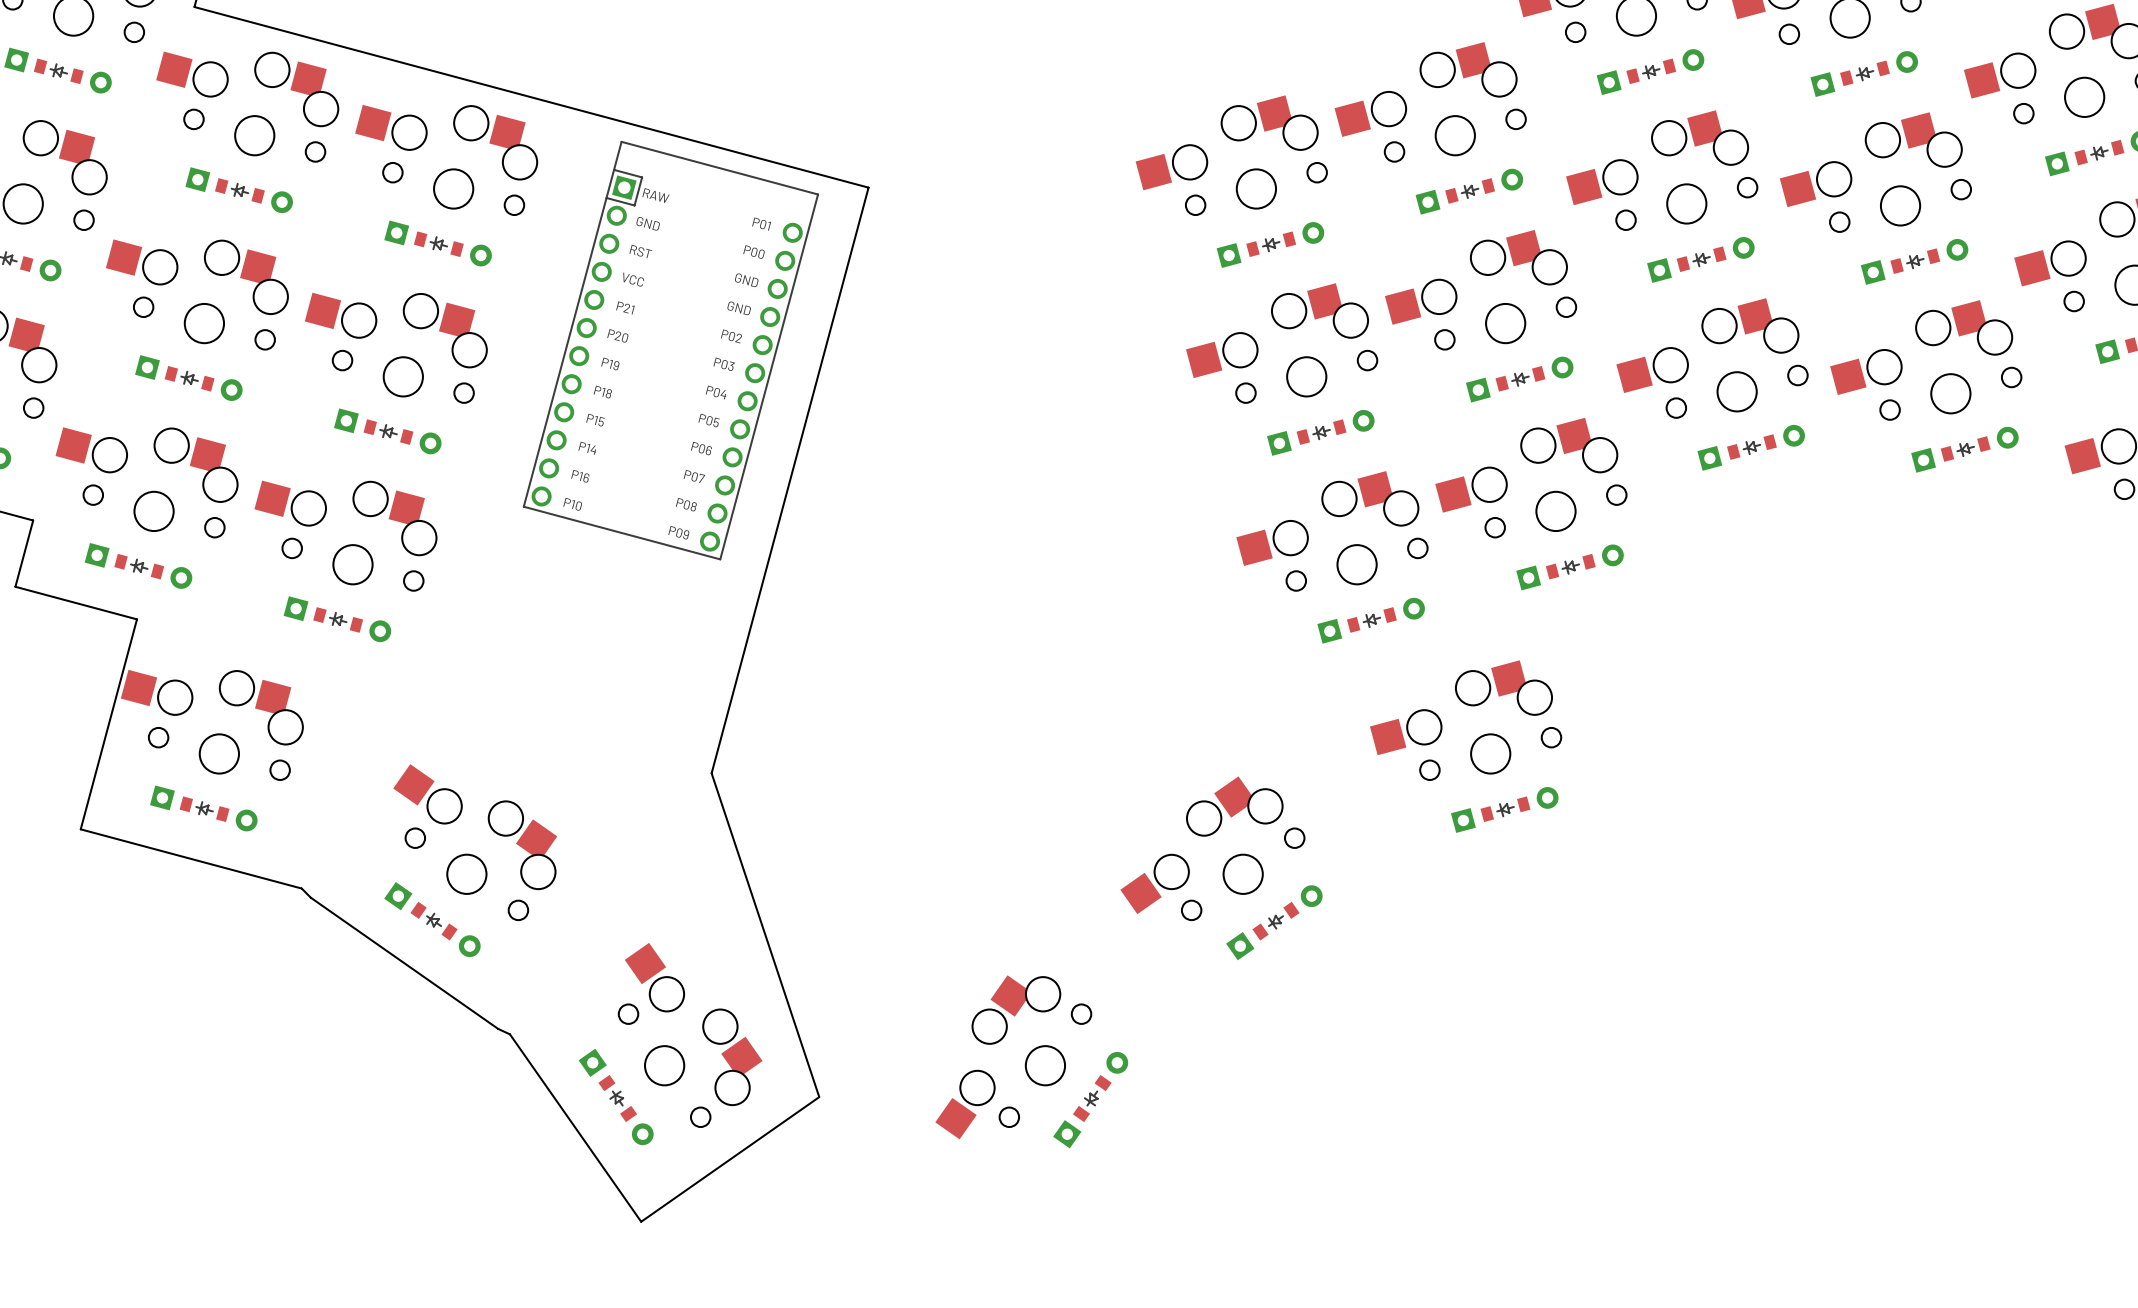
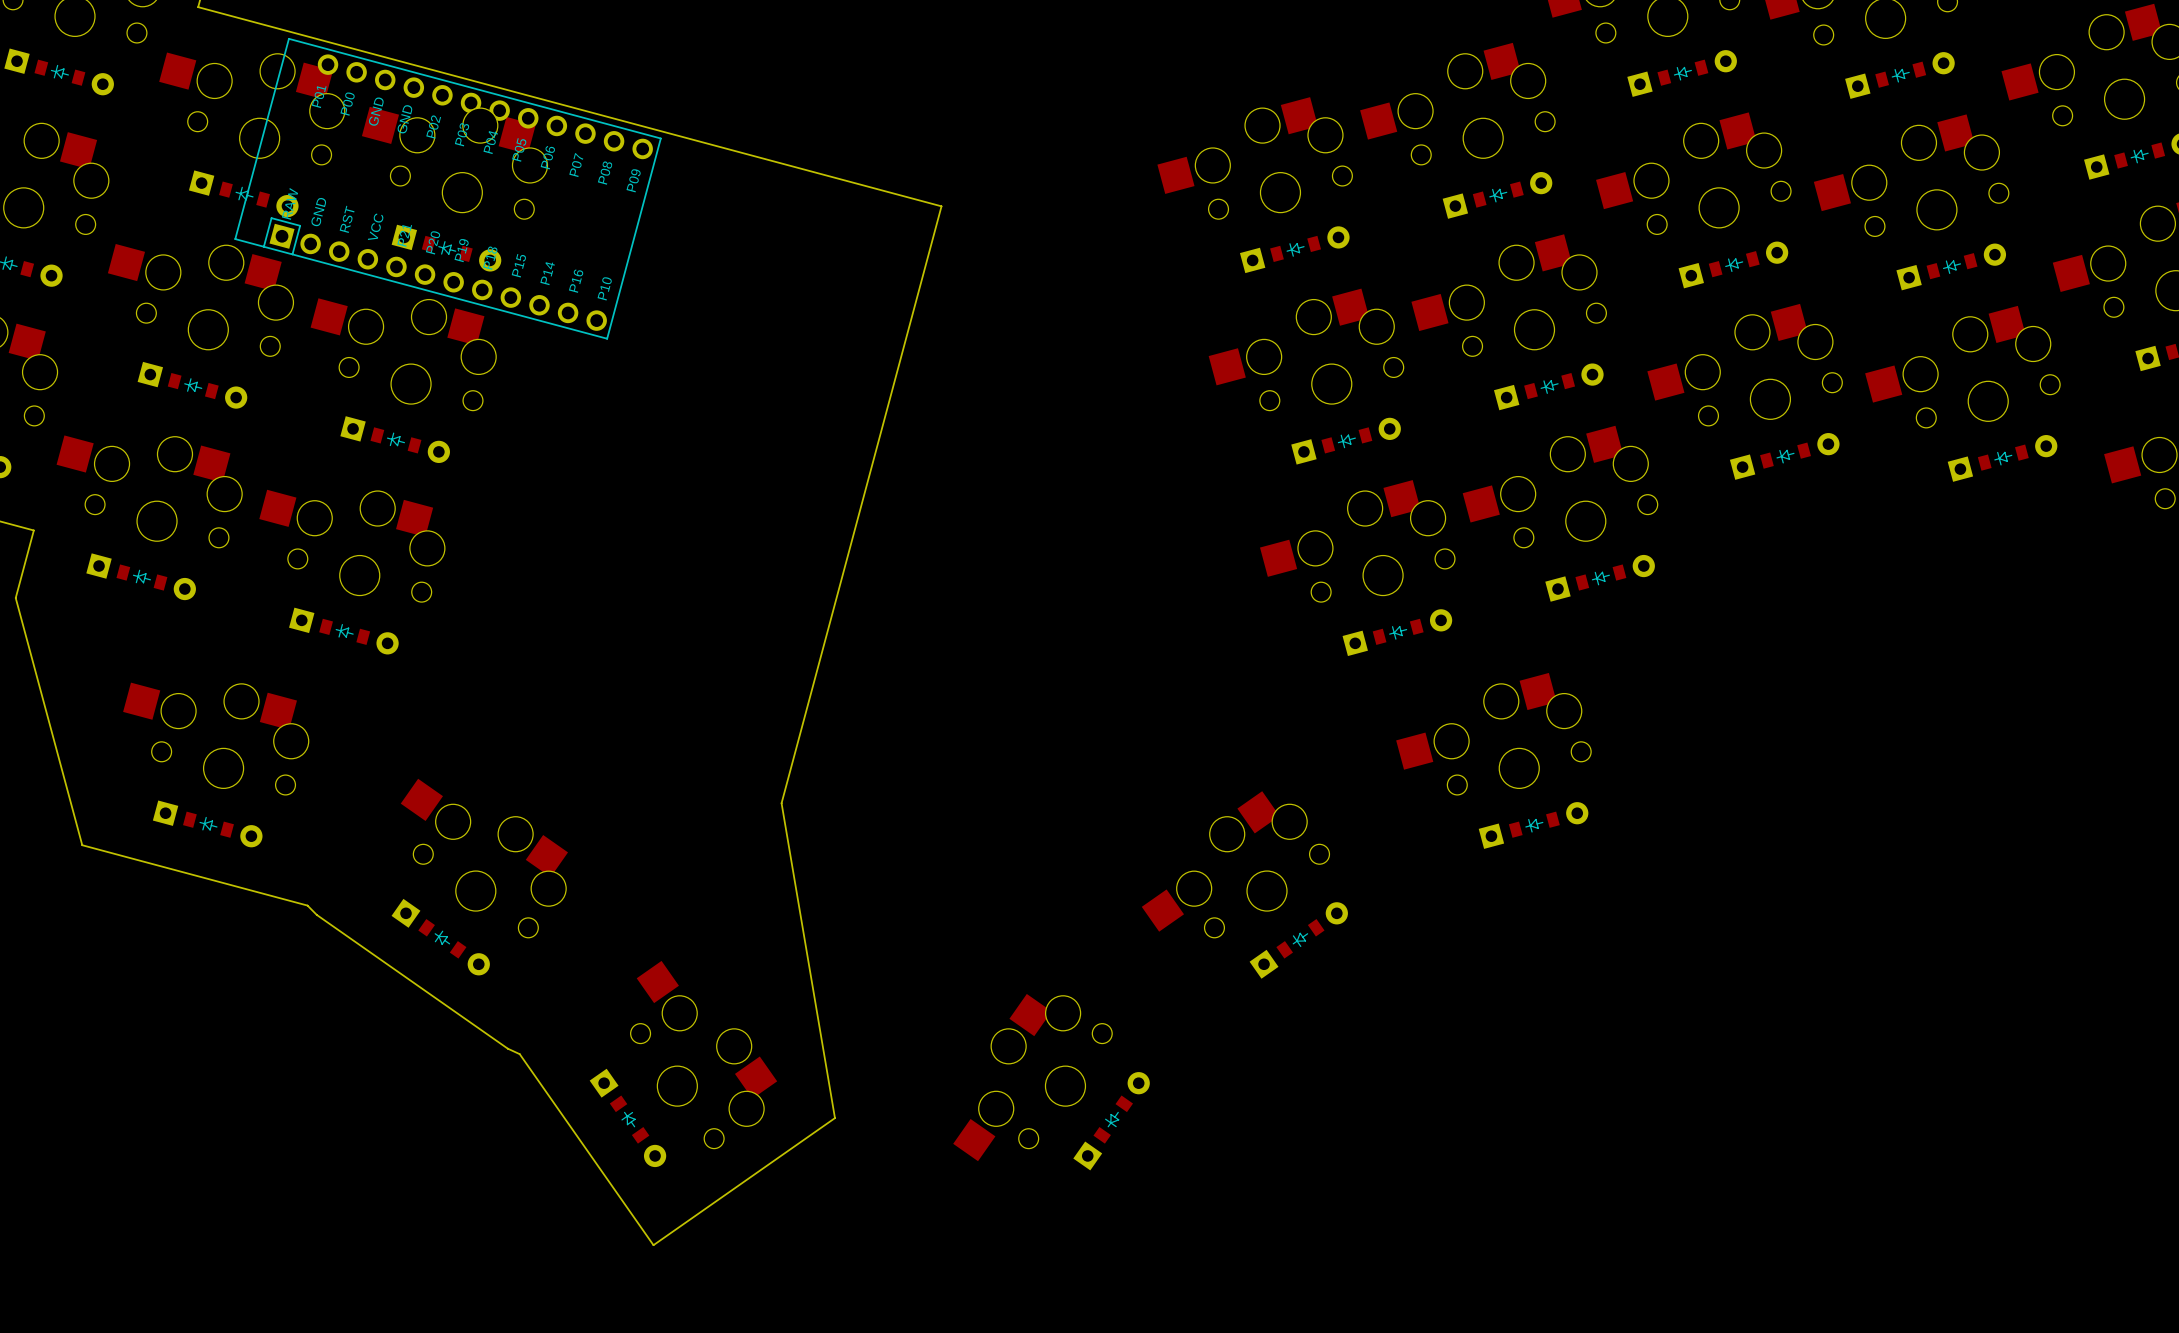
board edge: (868, 187) (711, 773) (819, 1097) -> (885, 191) (941, 206) (781, 803) (834, 1118)
part rotation: 0° (670, 350) -> 90° counterclockwise (448, 188)
part position: (670, 350) -> (448, 188)
board edge: (15, 586) (137, 619) (80, 829) -> (15, 598) (82, 845)

